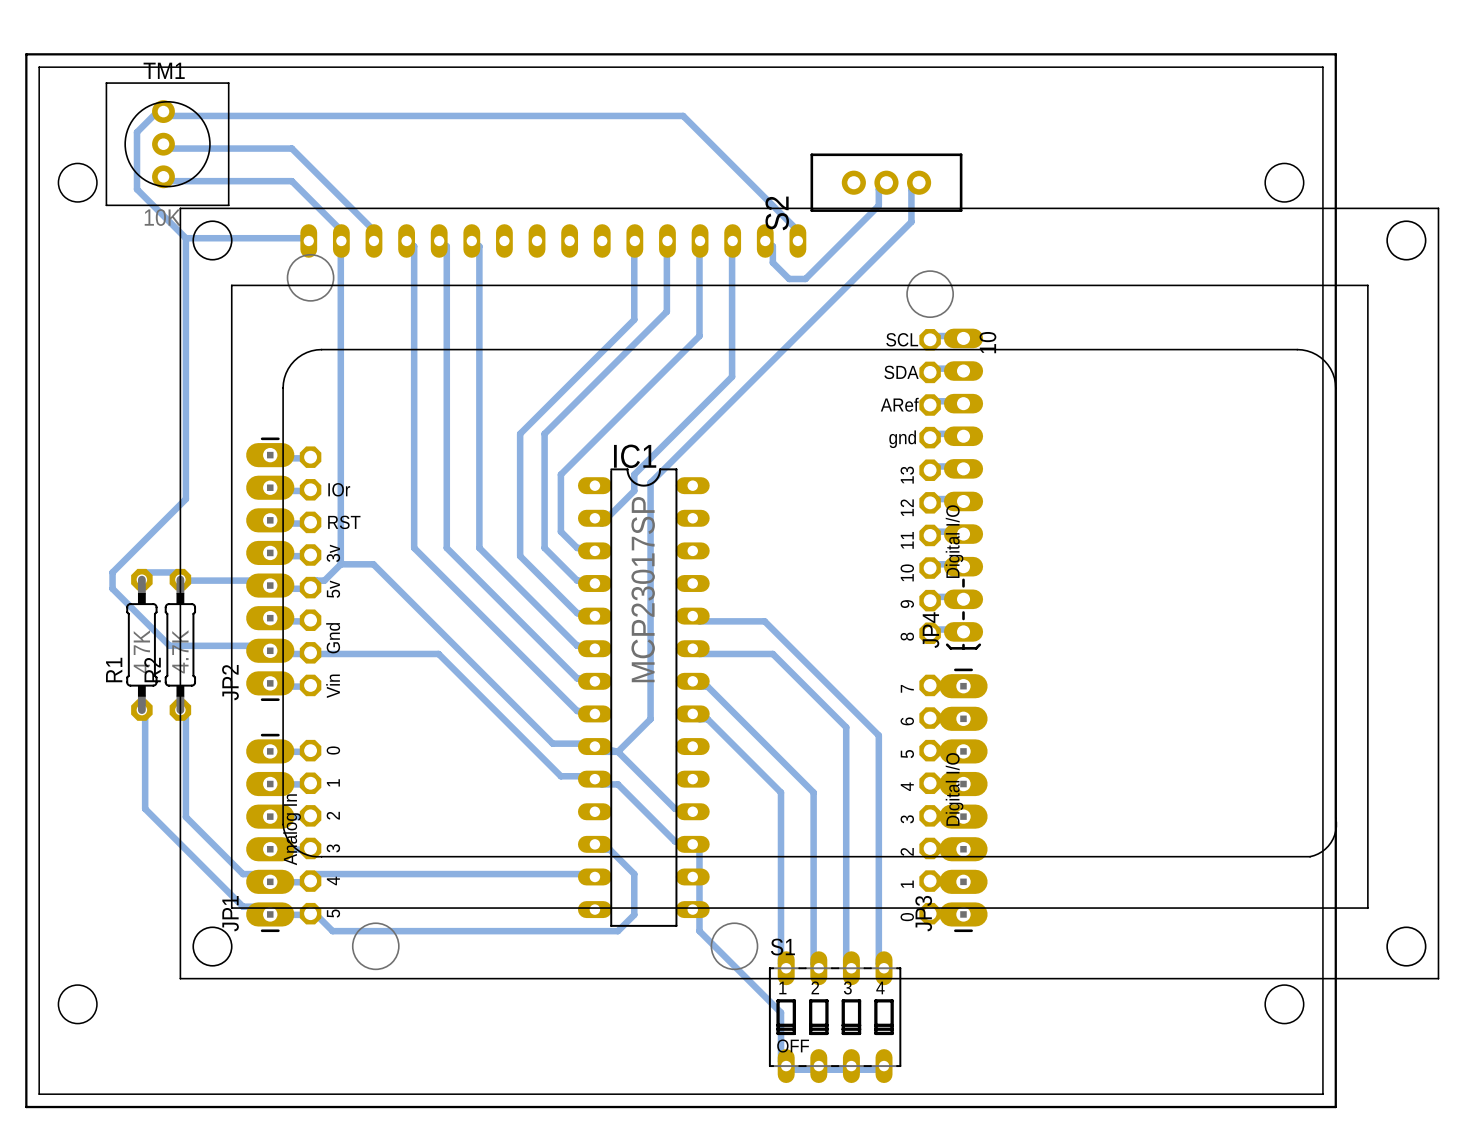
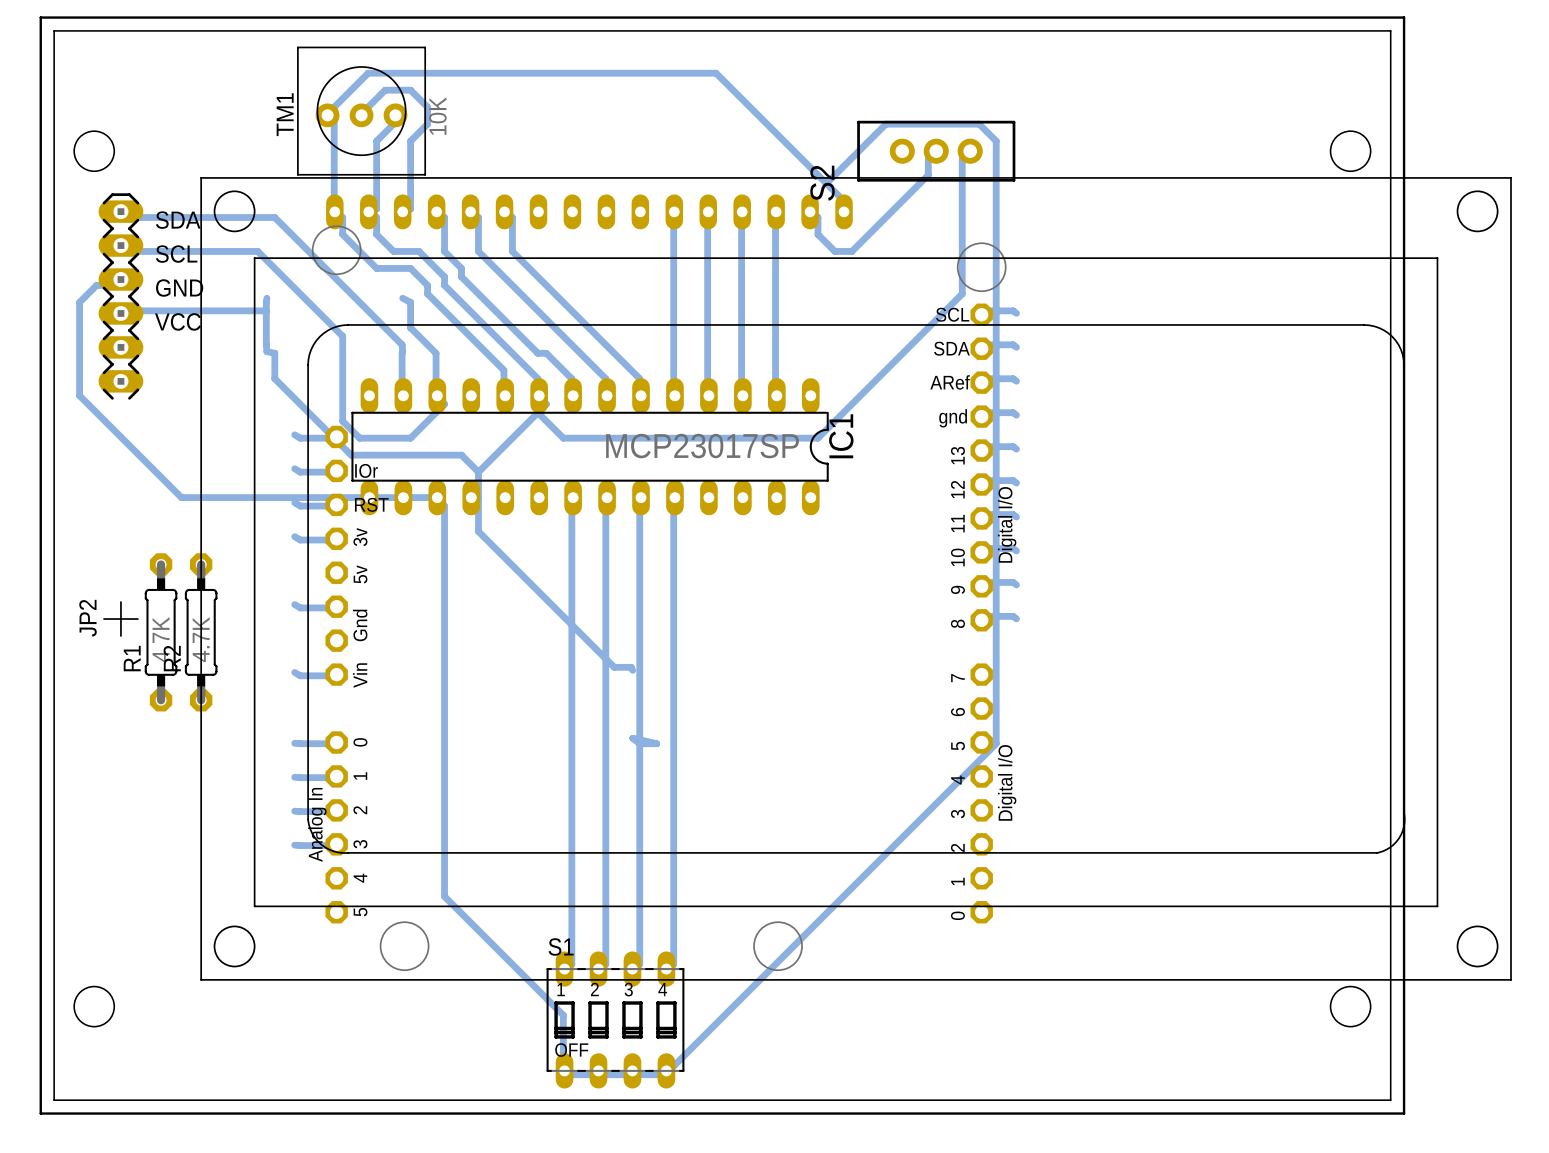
bottom track: (683, 115) (169, 115) (161, 107) (137, 132) (137, 189) (185, 238) -> (724, 81) (716, 73) (368, 73) (327, 115) (334, 115) (334, 209)
bottom track: (163, 144) (169, 148) (291, 148) (373, 230) (373, 240) -> (361, 115) (385, 90) (410, 90) (427, 107) (427, 124) (410, 141) (410, 209) (402, 211)
TM1 rotation: 0° (167, 144) -> 90° counterclockwise (361, 111)
TM1 position: (167, 144) -> (361, 111)
bottom track: (163, 176) (169, 181) (291, 181) (340, 230) (340, 564) -> none
bottom track: (911, 221) (650, 482) (650, 719) (617, 751) (675, 808) (691, 808) (692, 811) -> (962, 192) (962, 293) (817, 438) (563, 438) (537, 412) (539, 395)
bottom track: (185, 238) (308, 238) -> none
bottom track: (185, 238) (185, 499) (112, 572) (112, 588) (169, 645) (267, 645) (275, 653) (438, 653) (560, 776) (593, 776) (601, 784) (617, 784) (675, 841) (691, 841) (699, 849) (699, 874) (692, 876) (699, 882) (699, 906) (692, 909) (699, 914) (699, 931) (781, 1012) (781, 1061) (789, 1069) (813, 1069) (818, 1066) (821, 1069) (846, 1069) (851, 1066) (854, 1069) (878, 1069) (884, 1066) -> none
bottom track: none -> (120, 211) (122, 217) (274, 217) (402, 344) (403, 395)
bottom track: none -> (334, 211) (342, 217) (342, 234) (376, 268) (410, 268) (427, 285) (427, 293) (503, 370) (505, 395)
bottom track: none -> (120, 245) (122, 251) (257, 251) (342, 336) (342, 421) (359, 438) (410, 438) (444, 404) (436, 395) (436, 353) (410, 327) (410, 302) (402, 298)
bottom track: (414, 278) (414, 303) -> (395, 115) (402, 115) (376, 141) (376, 209) (368, 211) (376, 217) (376, 234) (393, 251) (419, 251) (444, 276)
bottom track: none -> (444, 251) (461, 268) (461, 276) (537, 353) (546, 353) (571, 378) (573, 395)
bottom track: (446, 278) (446, 490) -> (478, 251) (605, 378) (607, 395)
bottom track: (479, 278) (479, 548) (577, 645) (593, 645) (594, 648) -> (512, 251) (639, 378) (641, 395)
bottom track: none -> (120, 279) (113, 285) (96, 285) (79, 302) (79, 395) (181, 497) (436, 497) (444, 506)
bottom track: (414, 311) (414, 523) -> (444, 285) (537, 378) (539, 395)
bottom track: (666, 311) (544, 433) (544, 548) (577, 580) (593, 580) (594, 583) -> (707, 285) (708, 395)
bottom track: (634, 319) (520, 433) (520, 556) (577, 613) (593, 613) (594, 616) -> (673, 293) (674, 395)
bottom track: none -> (266, 298) (266, 351) (274, 353) (274, 378) (351, 455) (461, 455) (478, 472) (546, 404) (539, 395)
bottom track: none -> (266, 310) (122, 310) (120, 313)
bottom track: (699, 336) (560, 474) (560, 531) (577, 548) (593, 548) (594, 550) -> (741, 310) (742, 395)
bottom track: (732, 376) (634, 474) (634, 490) (601, 523) (594, 518) -> (775, 353) (776, 395)
JP2 footprint: [246, 437, 295, 701] -> [98, 193, 144, 637]
JP4: (963, 489) -> none
bottom track: none -> (573, 497) (571, 964) (564, 969)
bottom track: none -> (607, 497) (605, 964) (598, 969)
bottom track: none -> (641, 497) (639, 964) (632, 969)
bottom track: (414, 548) (577, 711) (593, 711) (594, 713) -> (444, 531) (444, 896) (563, 1015) (564, 1070) (571, 1074) (597, 1074) (598, 1070) (605, 1074) (631, 1074) (632, 1070) (639, 1074) (665, 1074) (666, 1070) (673, 1066) (996, 743) (996, 141) (979, 124) (885, 124) (826, 183)
bottom track: (340, 564) (373, 564) (552, 743) (593, 743) (594, 746) -> none
bottom track: (340, 564) (324, 580) (316, 580) (308, 588) (275, 588) (267, 580) (185, 580) (180, 579) (177, 572) (145, 572) (141, 579) -> none
bottom track: (692, 616) (699, 621) (764, 621) (878, 735) (878, 963) (884, 968) -> none
bottom track: (692, 648) (699, 653) (772, 653) (846, 727) (846, 963) (851, 968) -> none
bottom track: (692, 681) (699, 686) (707, 686) (813, 792) (813, 963) (818, 968) -> none
JP2 name position: JP2 (230, 682) -> JP2 (88, 618)
IC1 rotation: 0° (643, 697) -> 90° clockwise (590, 446)
bottom track: (141, 710) (145, 711) (145, 808) (242, 906) (267, 906) (270, 914) (316, 914) (332, 931) (617, 931) (634, 914) -> (666, 969) (673, 964) (673, 913)
bottom track: (180, 710) (185, 711) (185, 817) (242, 874) (267, 874) (270, 881) (275, 882) (308, 882) (316, 874) (593, 874) (594, 876) -> none
bottom track: (692, 713) (699, 719) (707, 719) (781, 792) (781, 963) (786, 968) -> none
JP3: (963, 800) -> none
JP1: (270, 832) -> none
bottom track: (594, 844) (601, 849) (609, 849) (634, 874) -> (674, 497) (673, 871)
S1 position: (835, 1017) -> (615, 1019)

